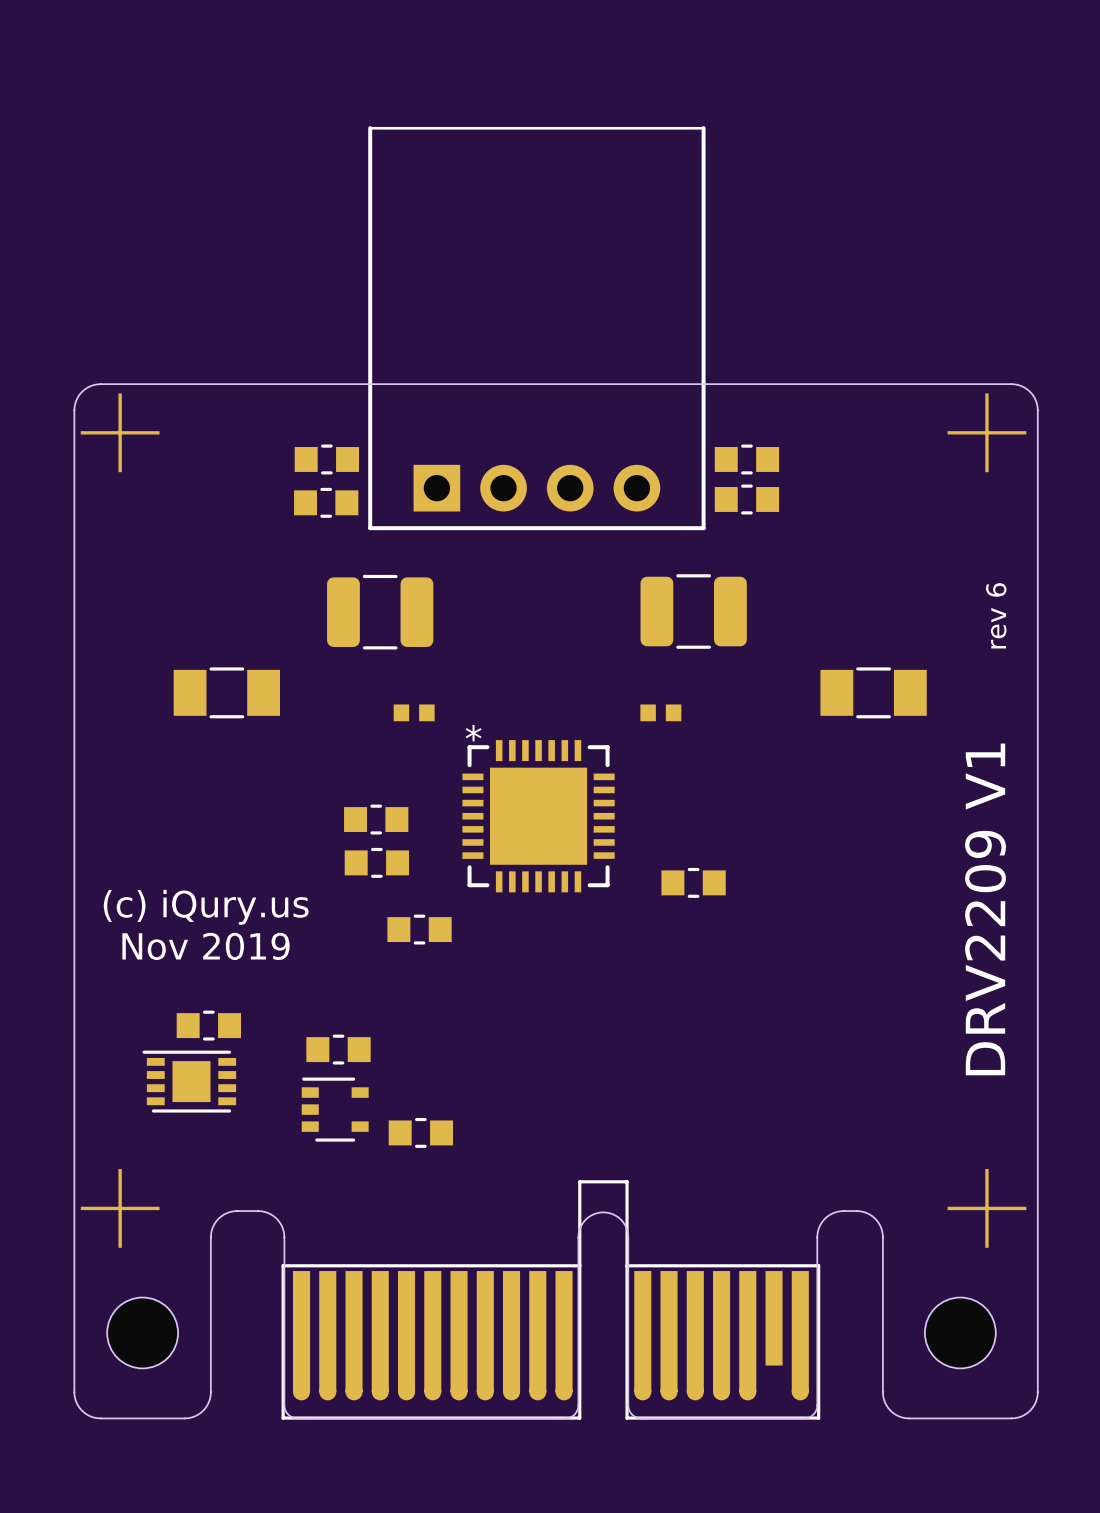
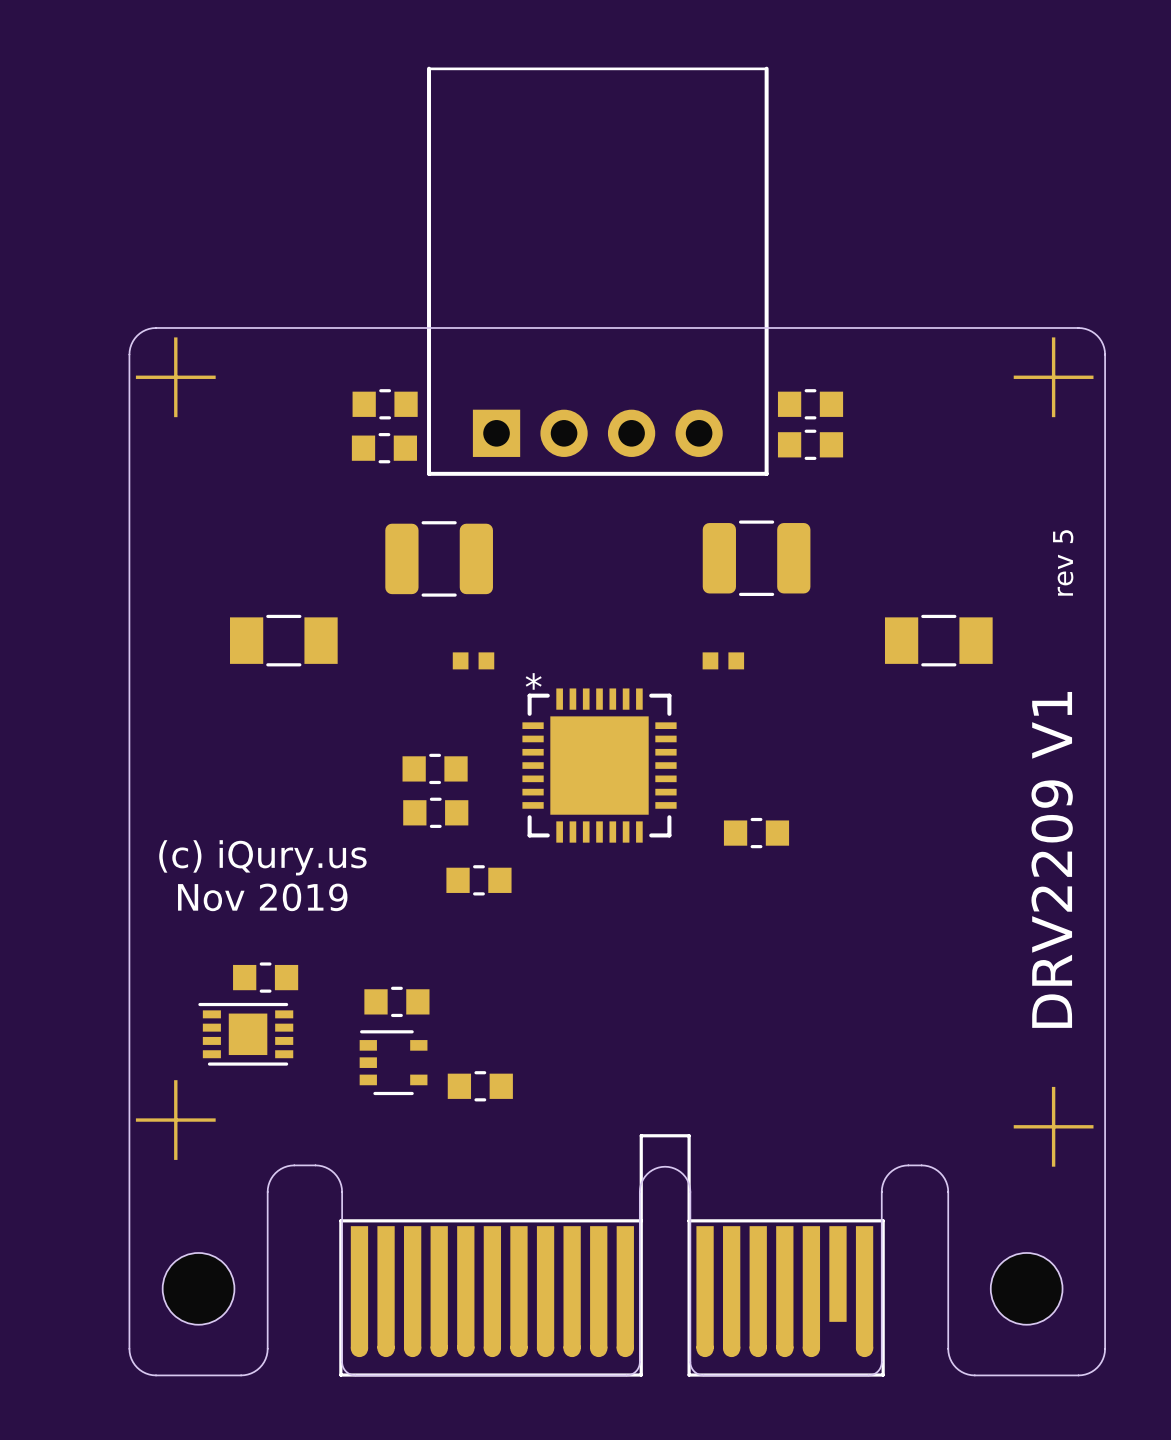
text: rev 6 (996, 615) -> rev 5 (1063, 562)
part position: (120, 1208) -> (175, 1120)
part position: (986, 1208) -> (1053, 1126)

